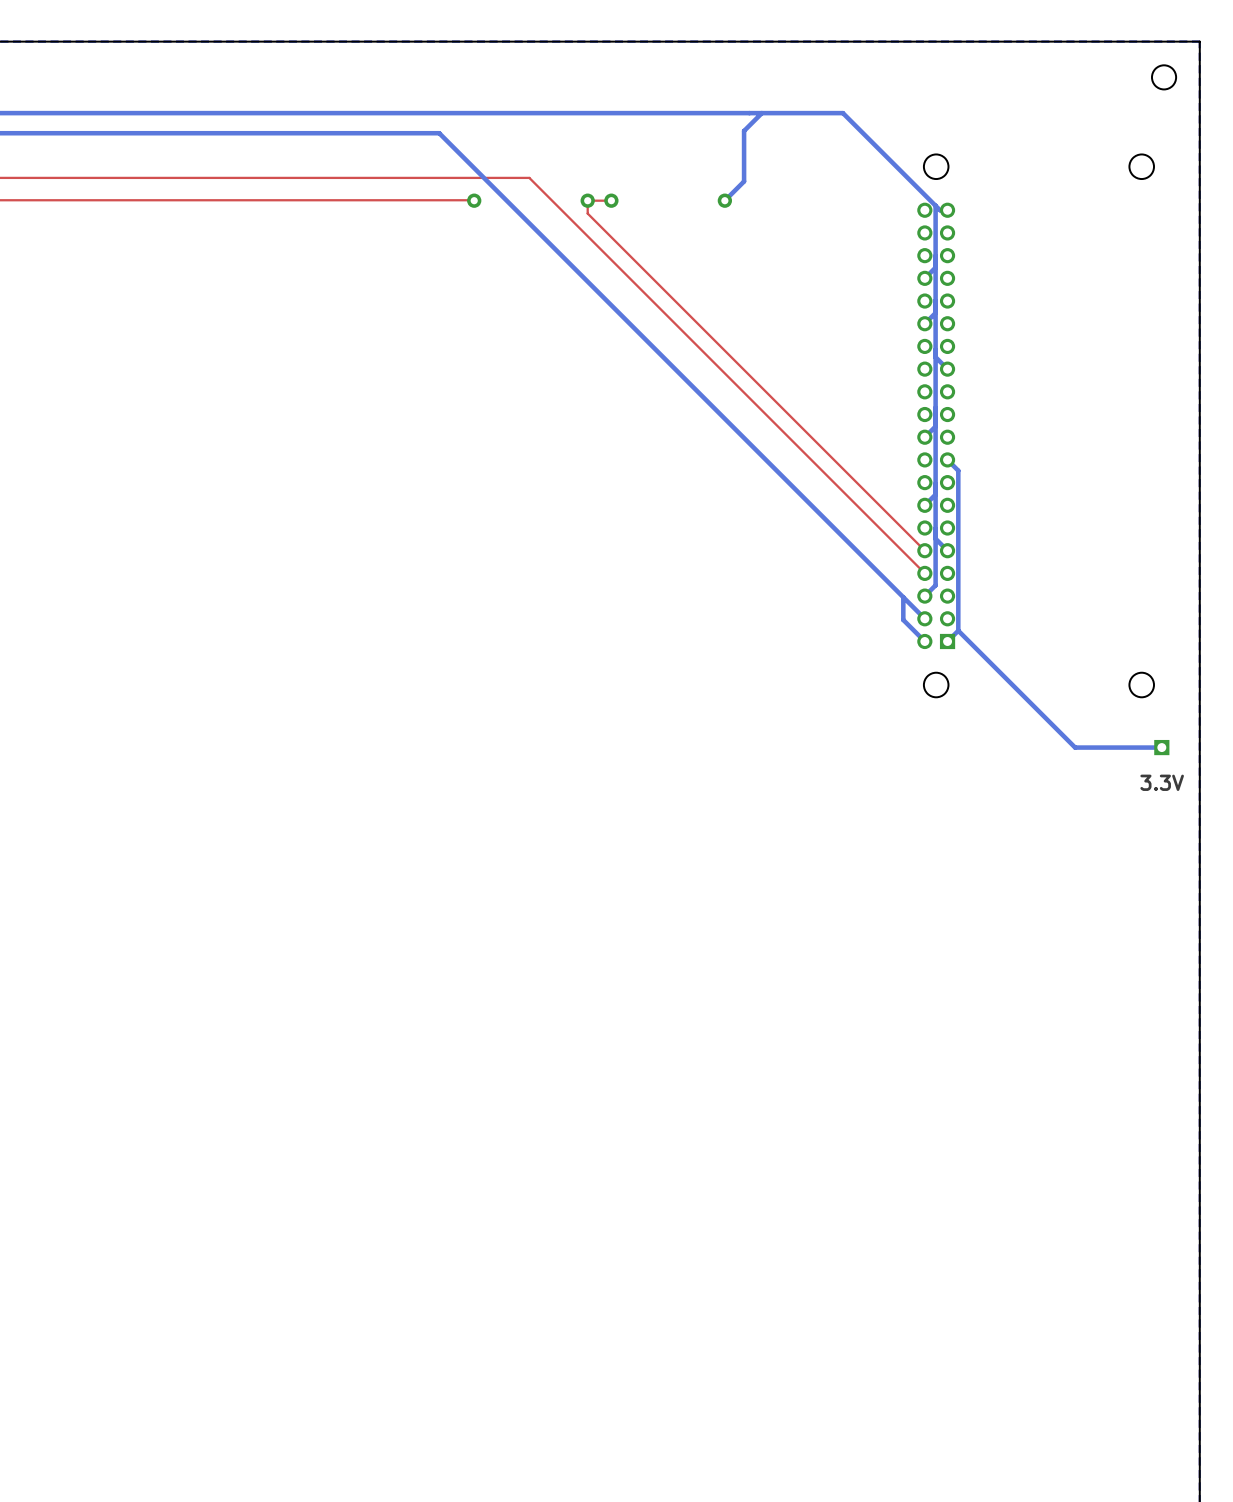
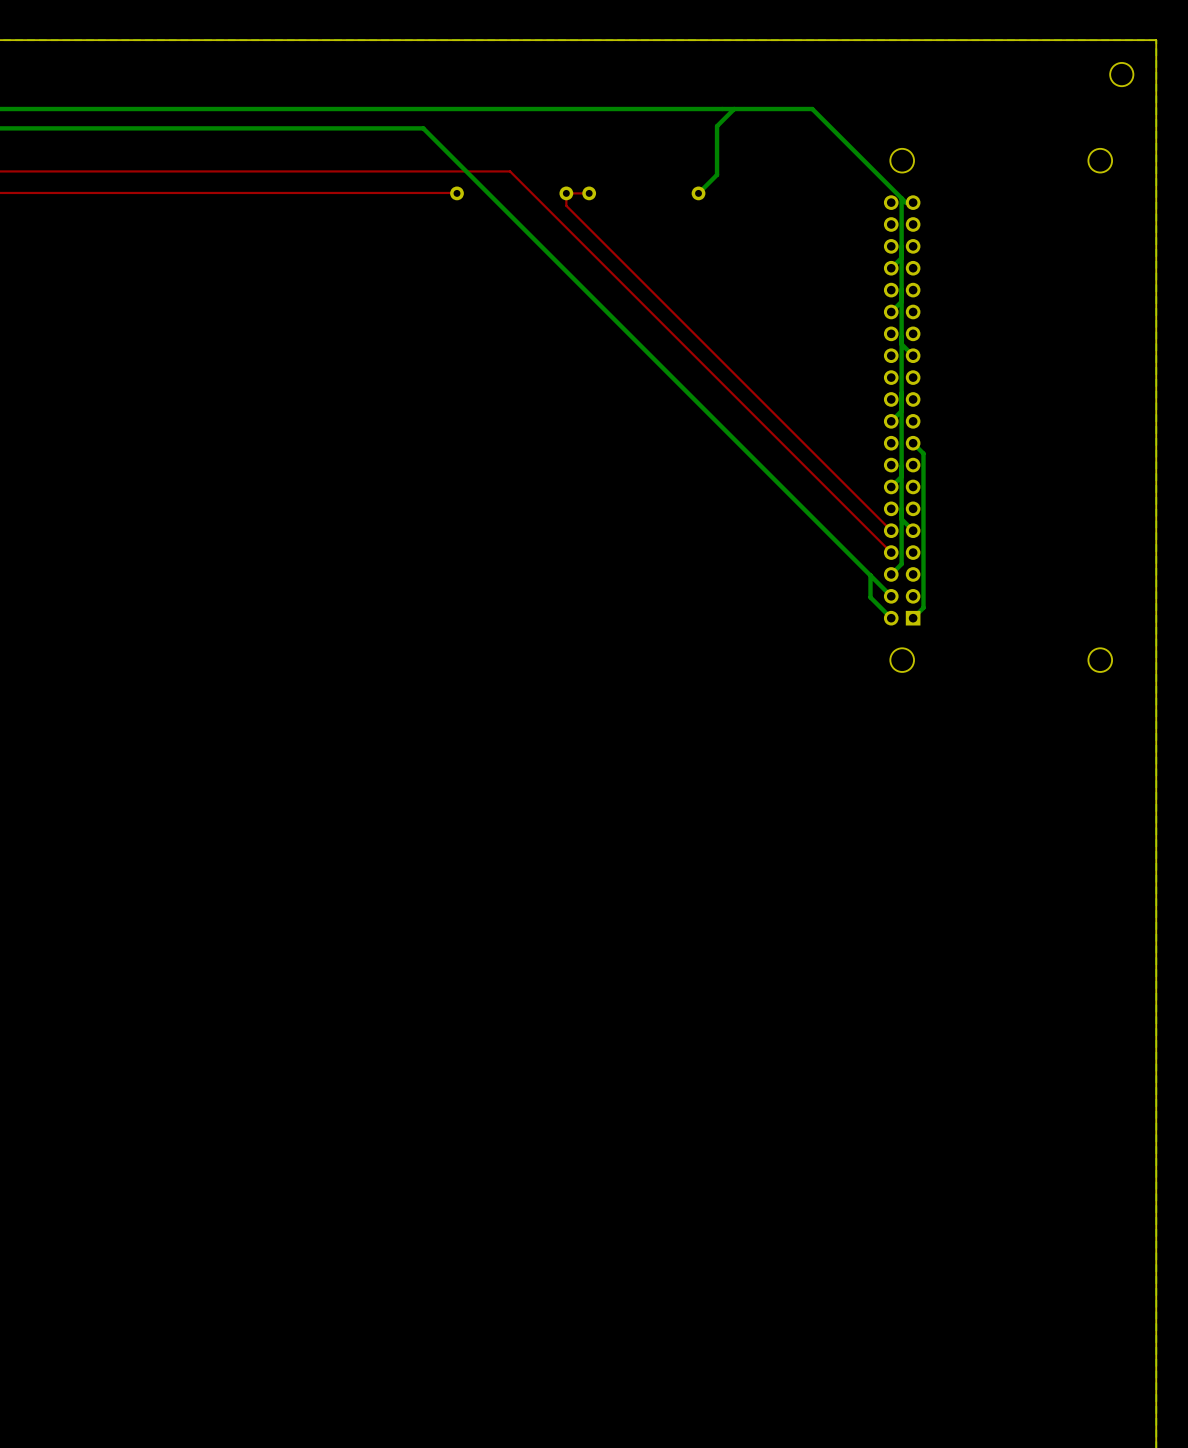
bottom track: (958, 630) (1075, 747) (1161, 747) -> none
part: (1161, 747) -> none
text: 3.3V (1162, 782) -> none

